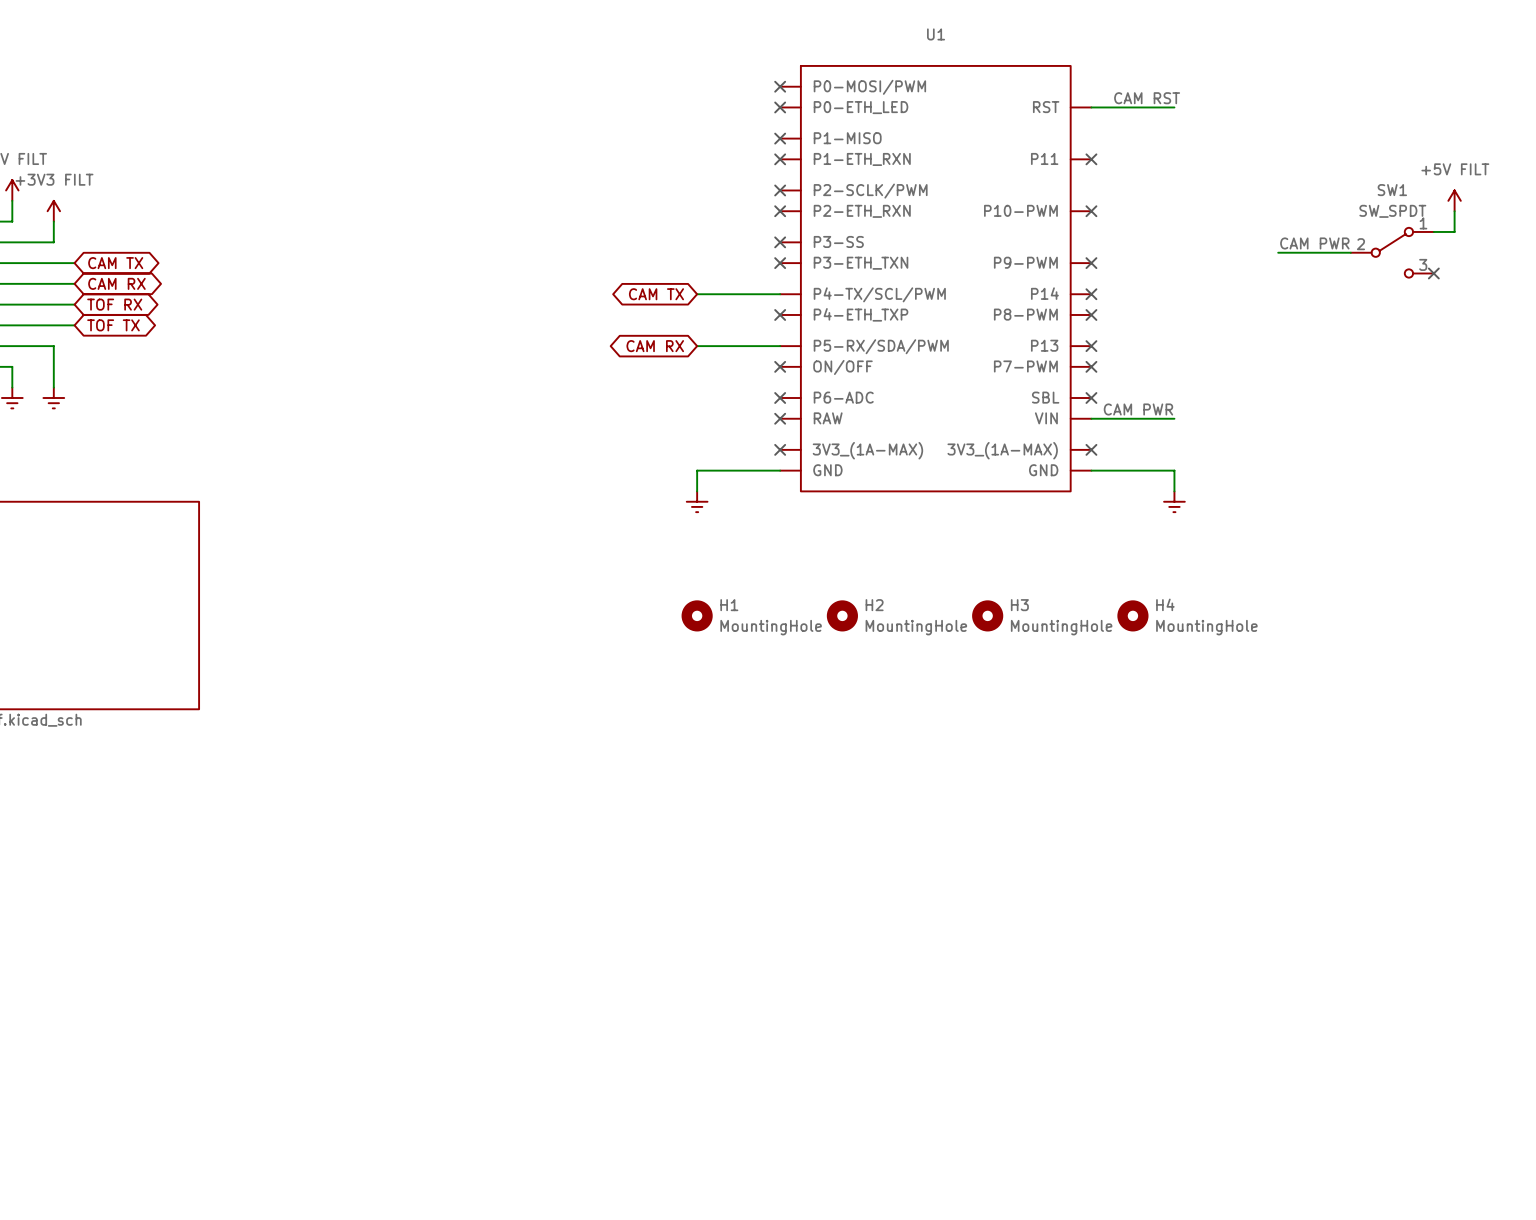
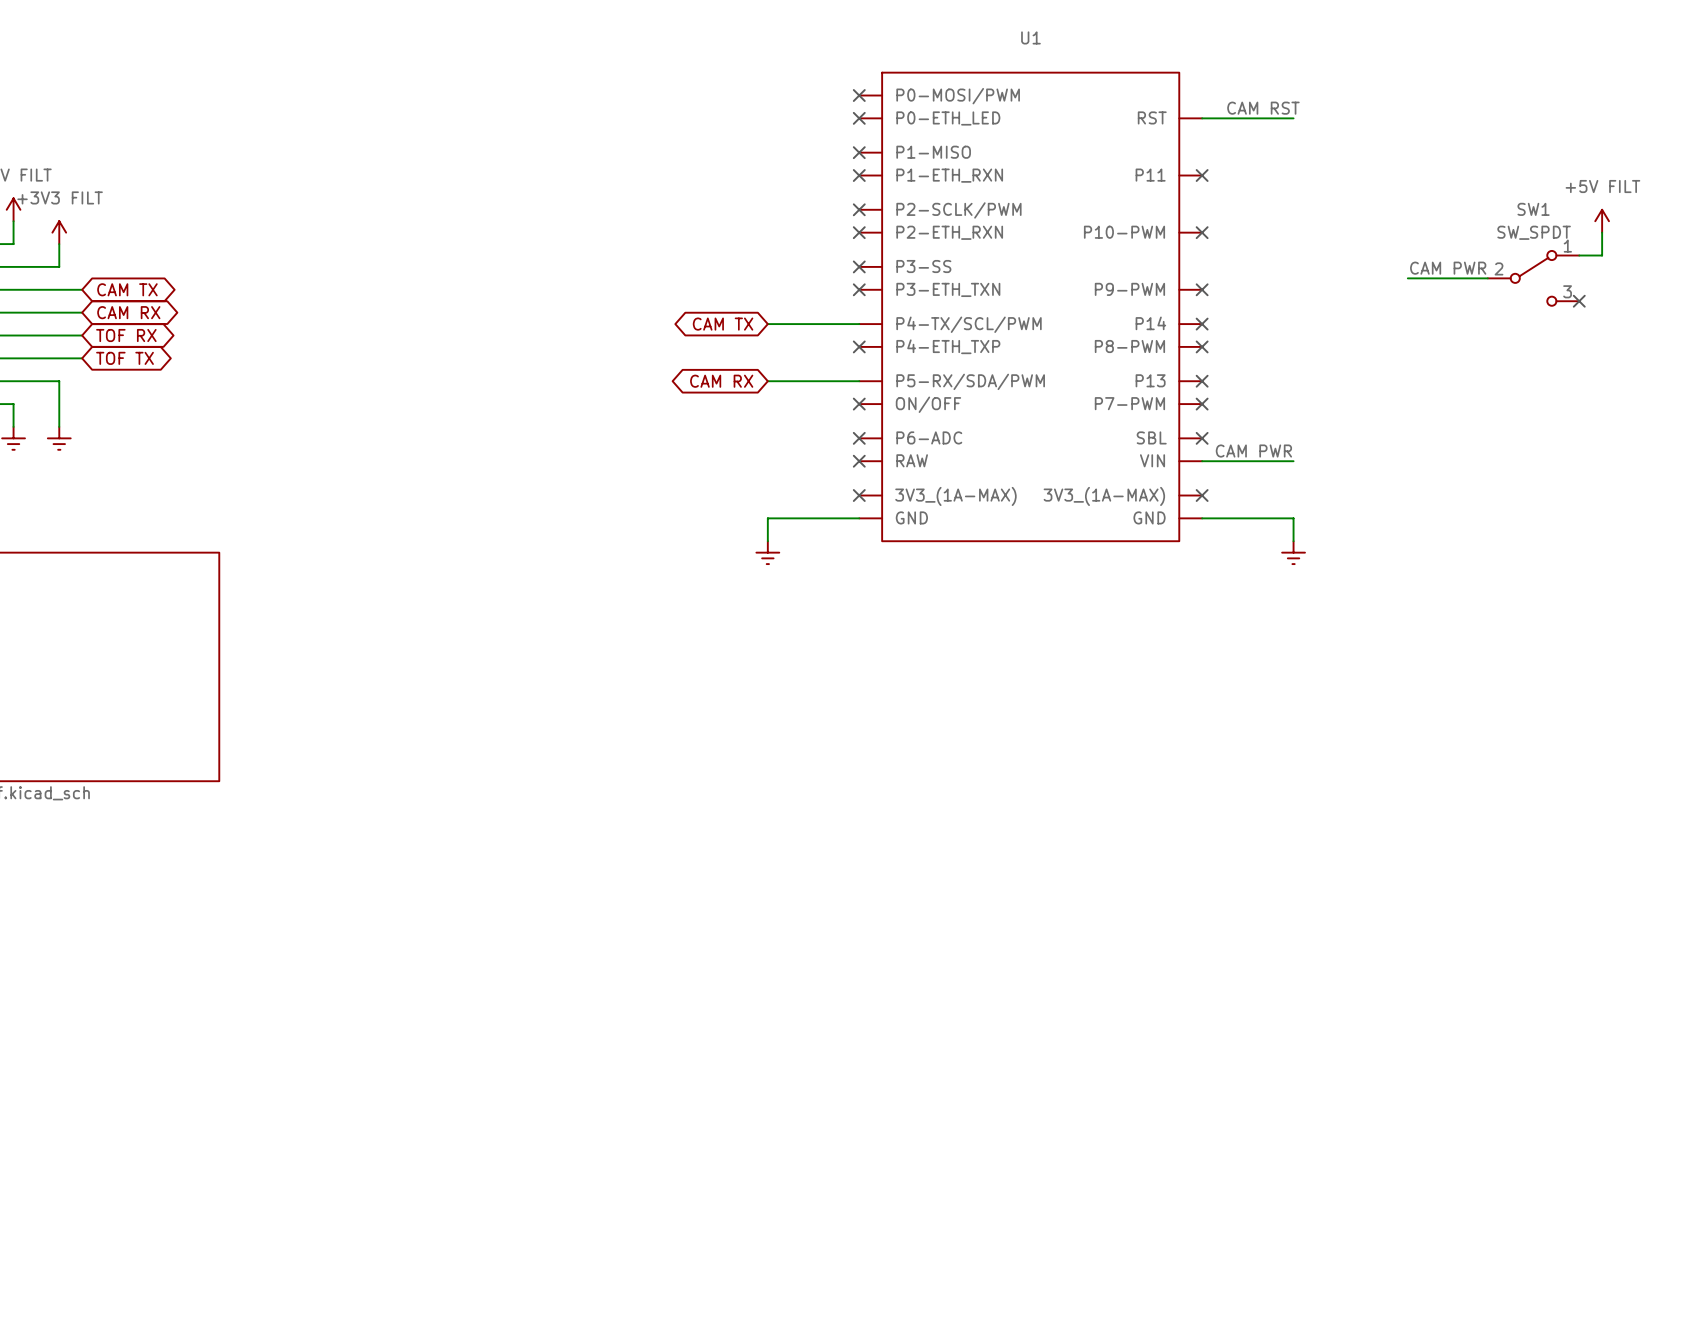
H1: MountingHole (697, 615) -> none
H2: MountingHole (842, 615) -> none
H3: MountingHole (987, 615) -> none
H4: MountingHole (1132, 615) -> none

